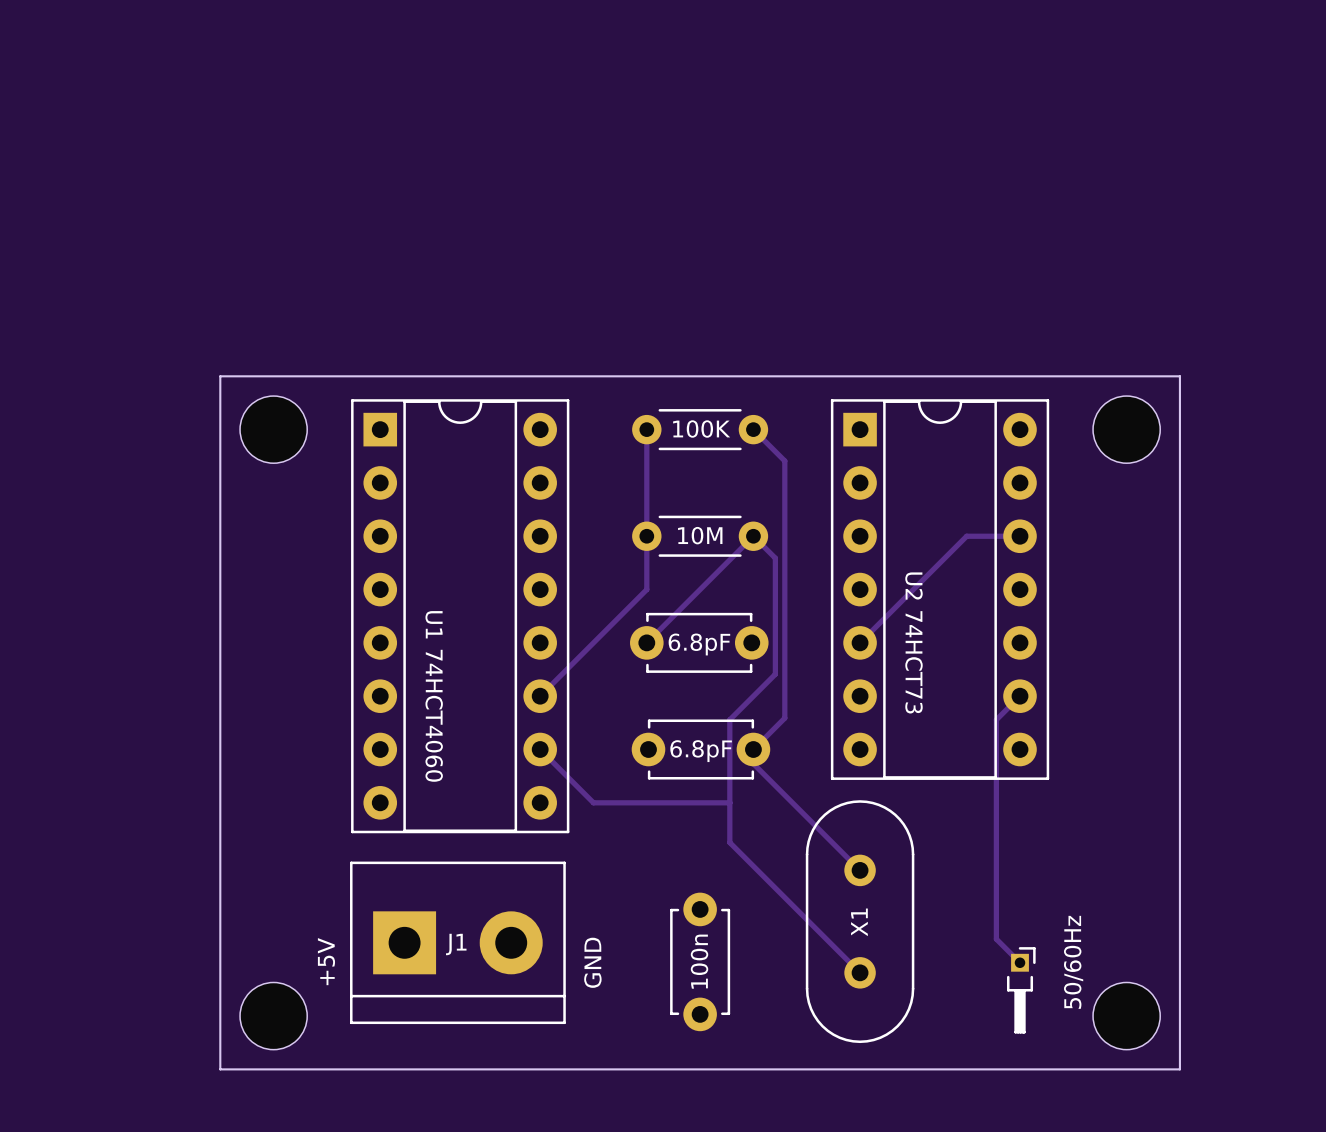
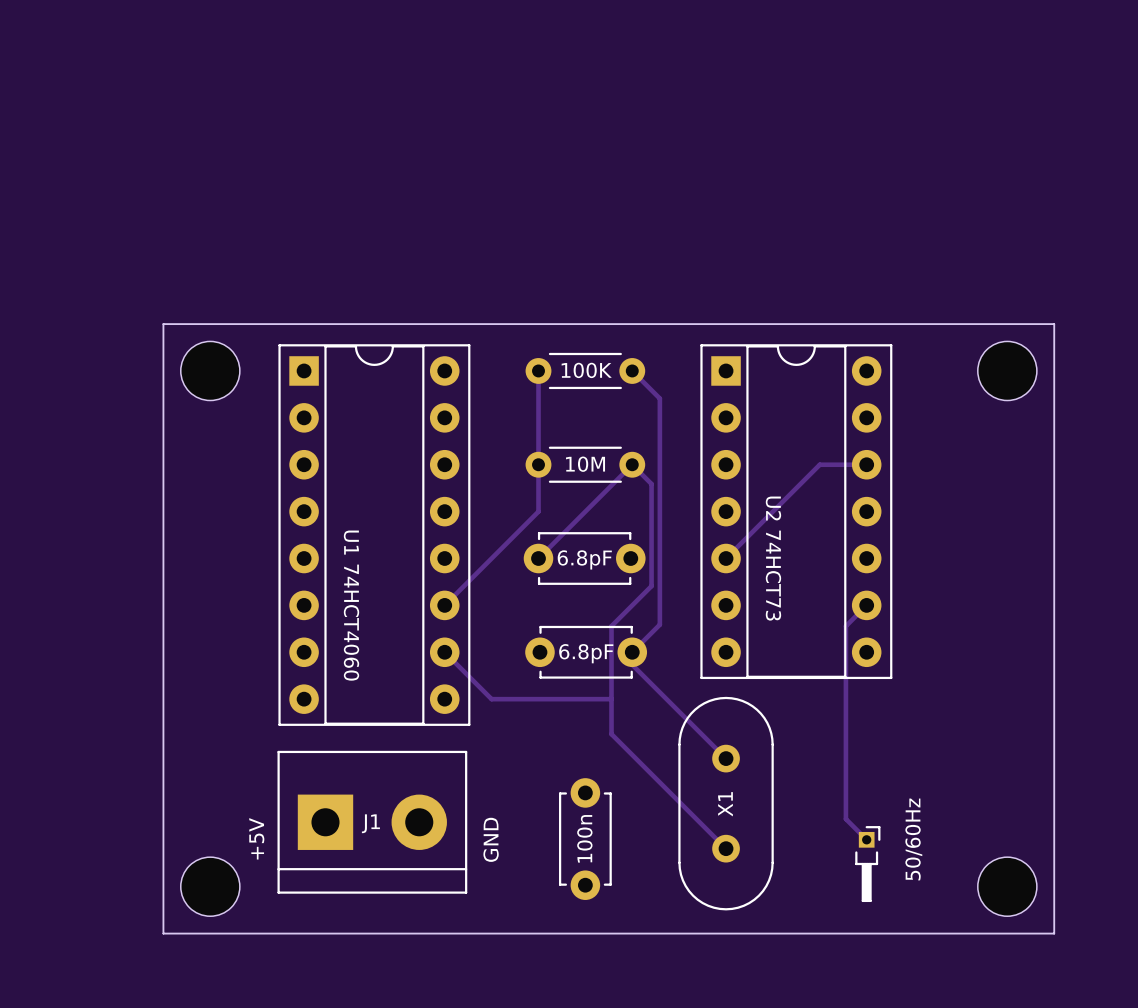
board edge: (1179, 376) (1179, 1069) -> (1007, 324) (1054, 324) (1054, 933) (1007, 933)
part position: (1126, 429) -> (1007, 370)
part position: (1126, 1016) -> (1007, 886)

